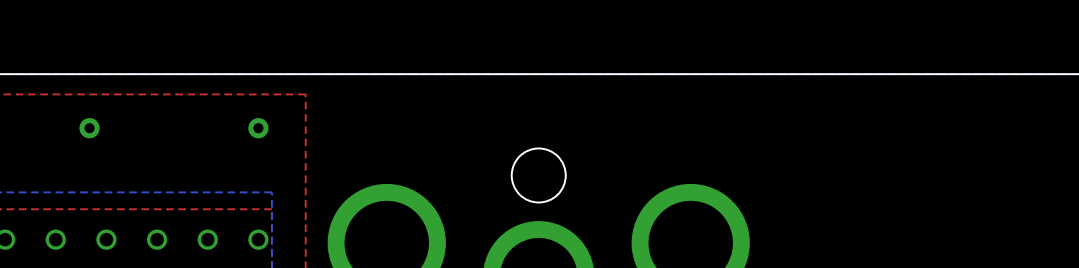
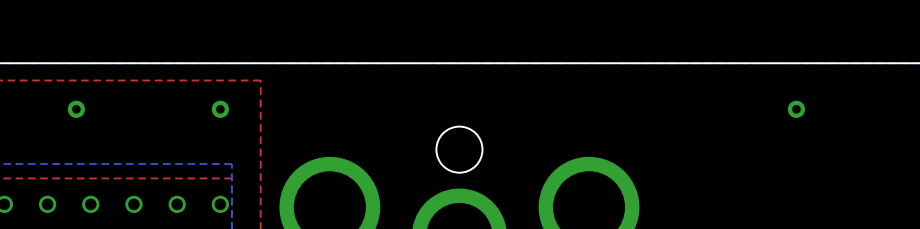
via: none -> (796, 109)

